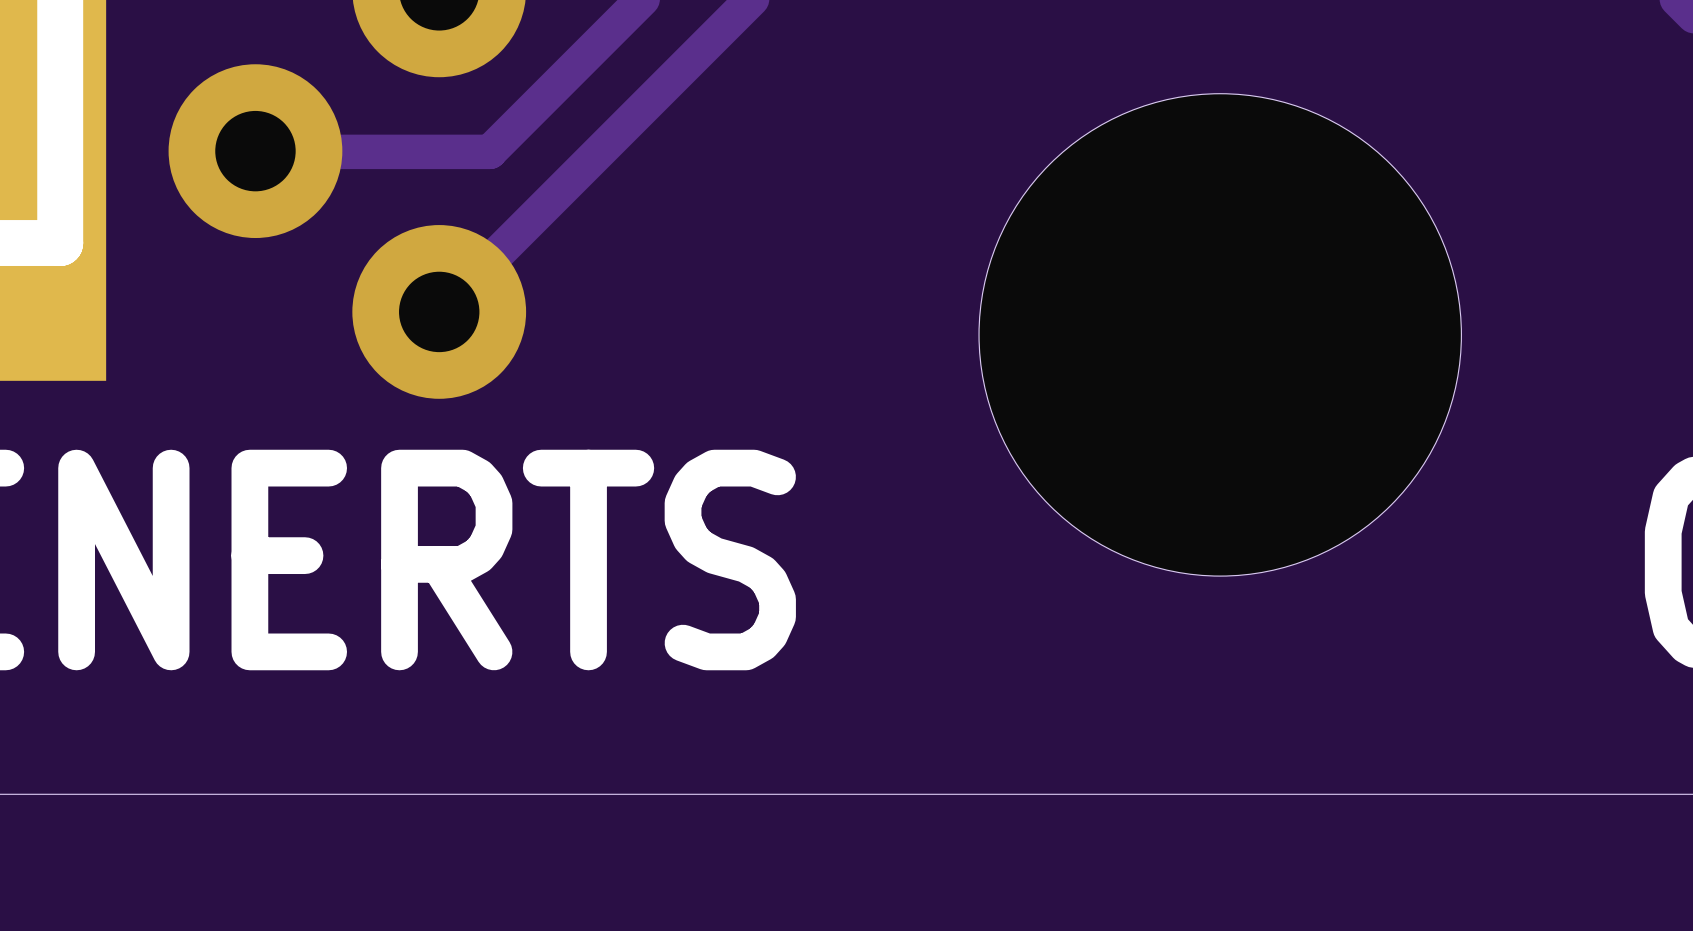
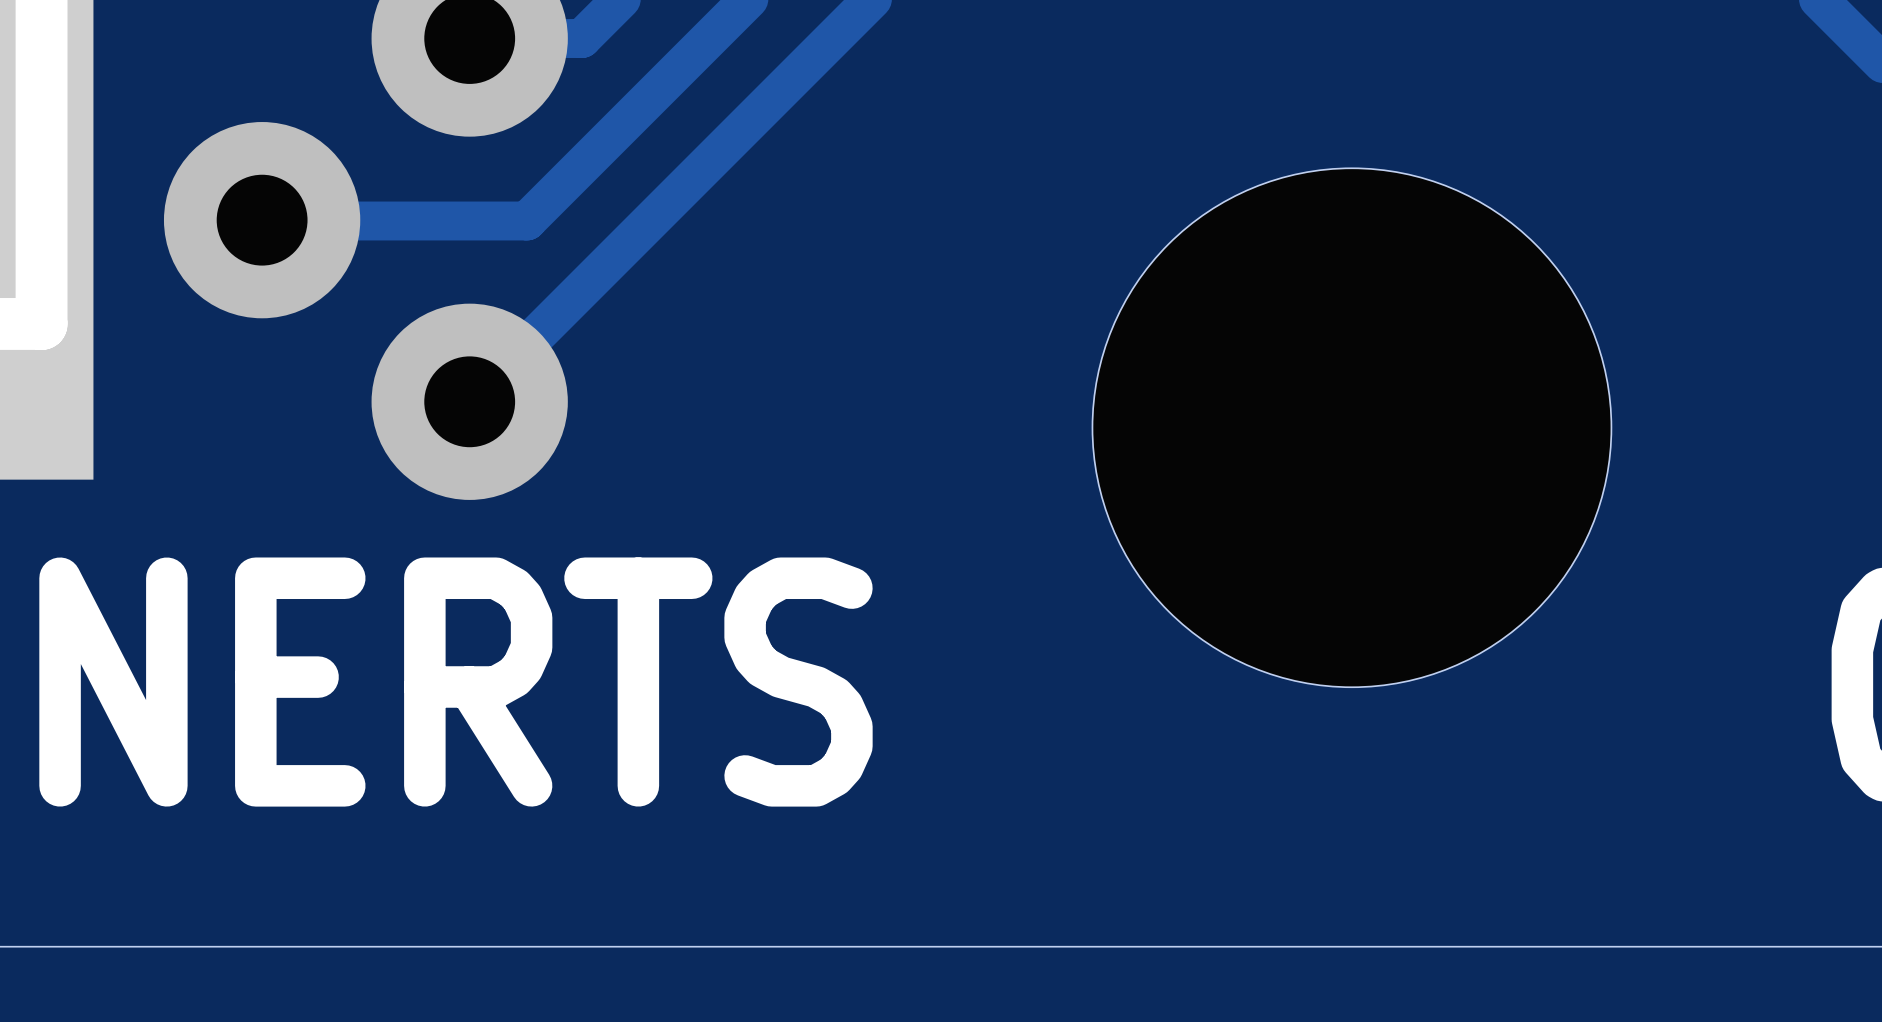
hole size: [979, 93, 1462, 577] -> [1092, 168, 1612, 688]

